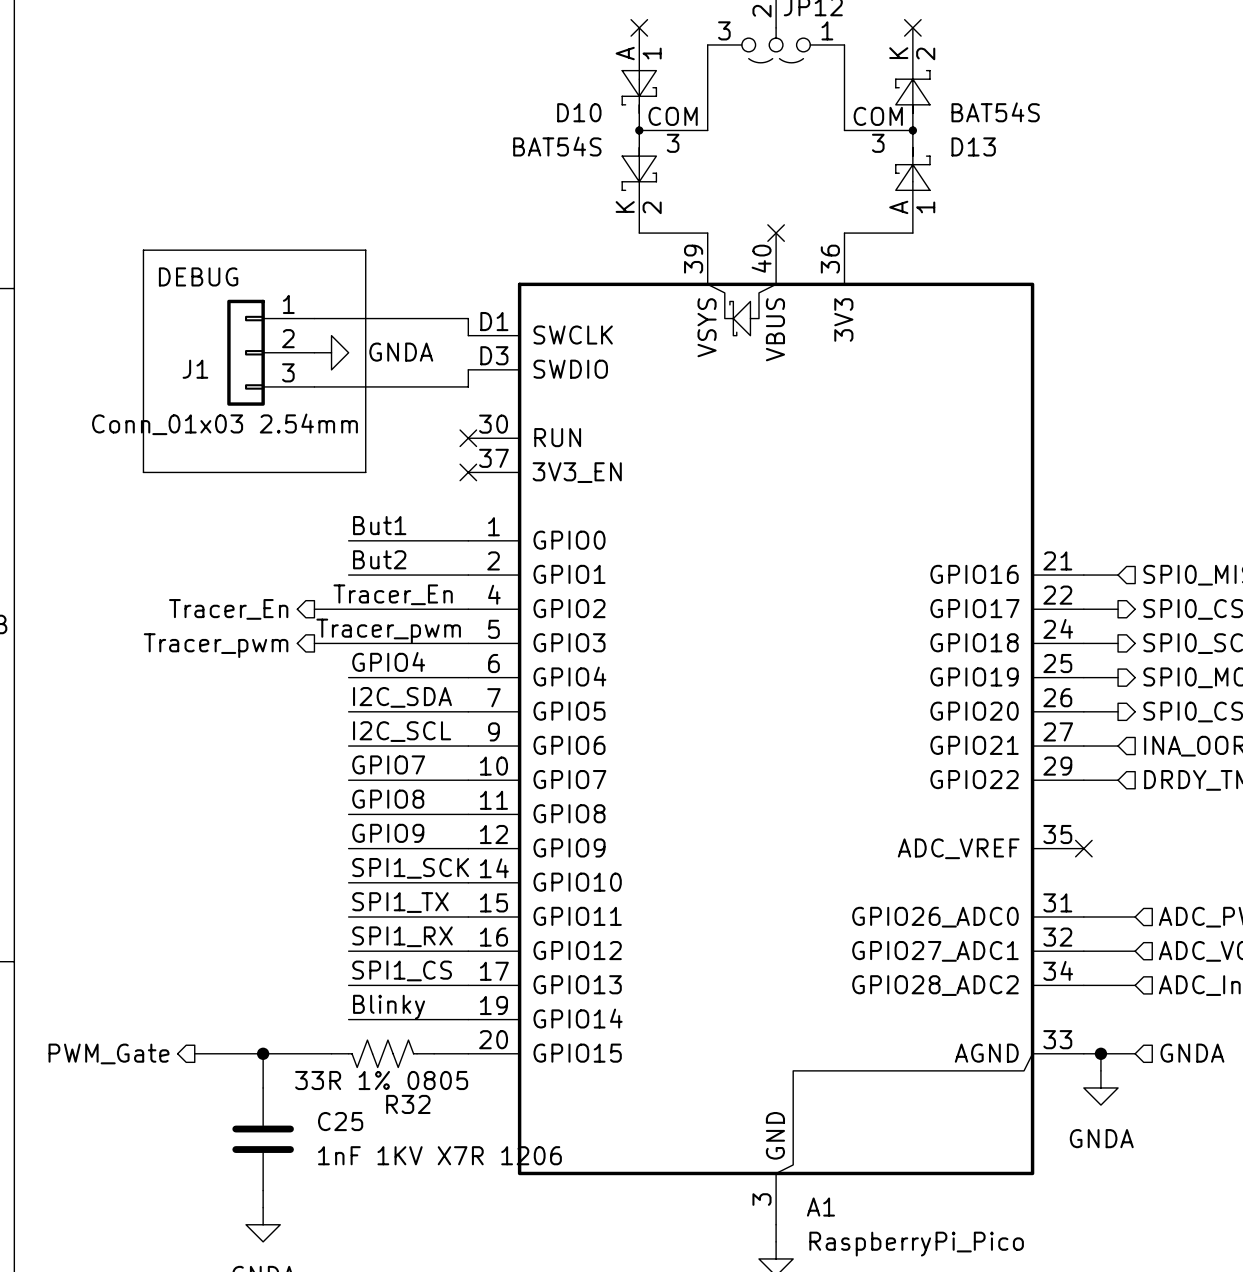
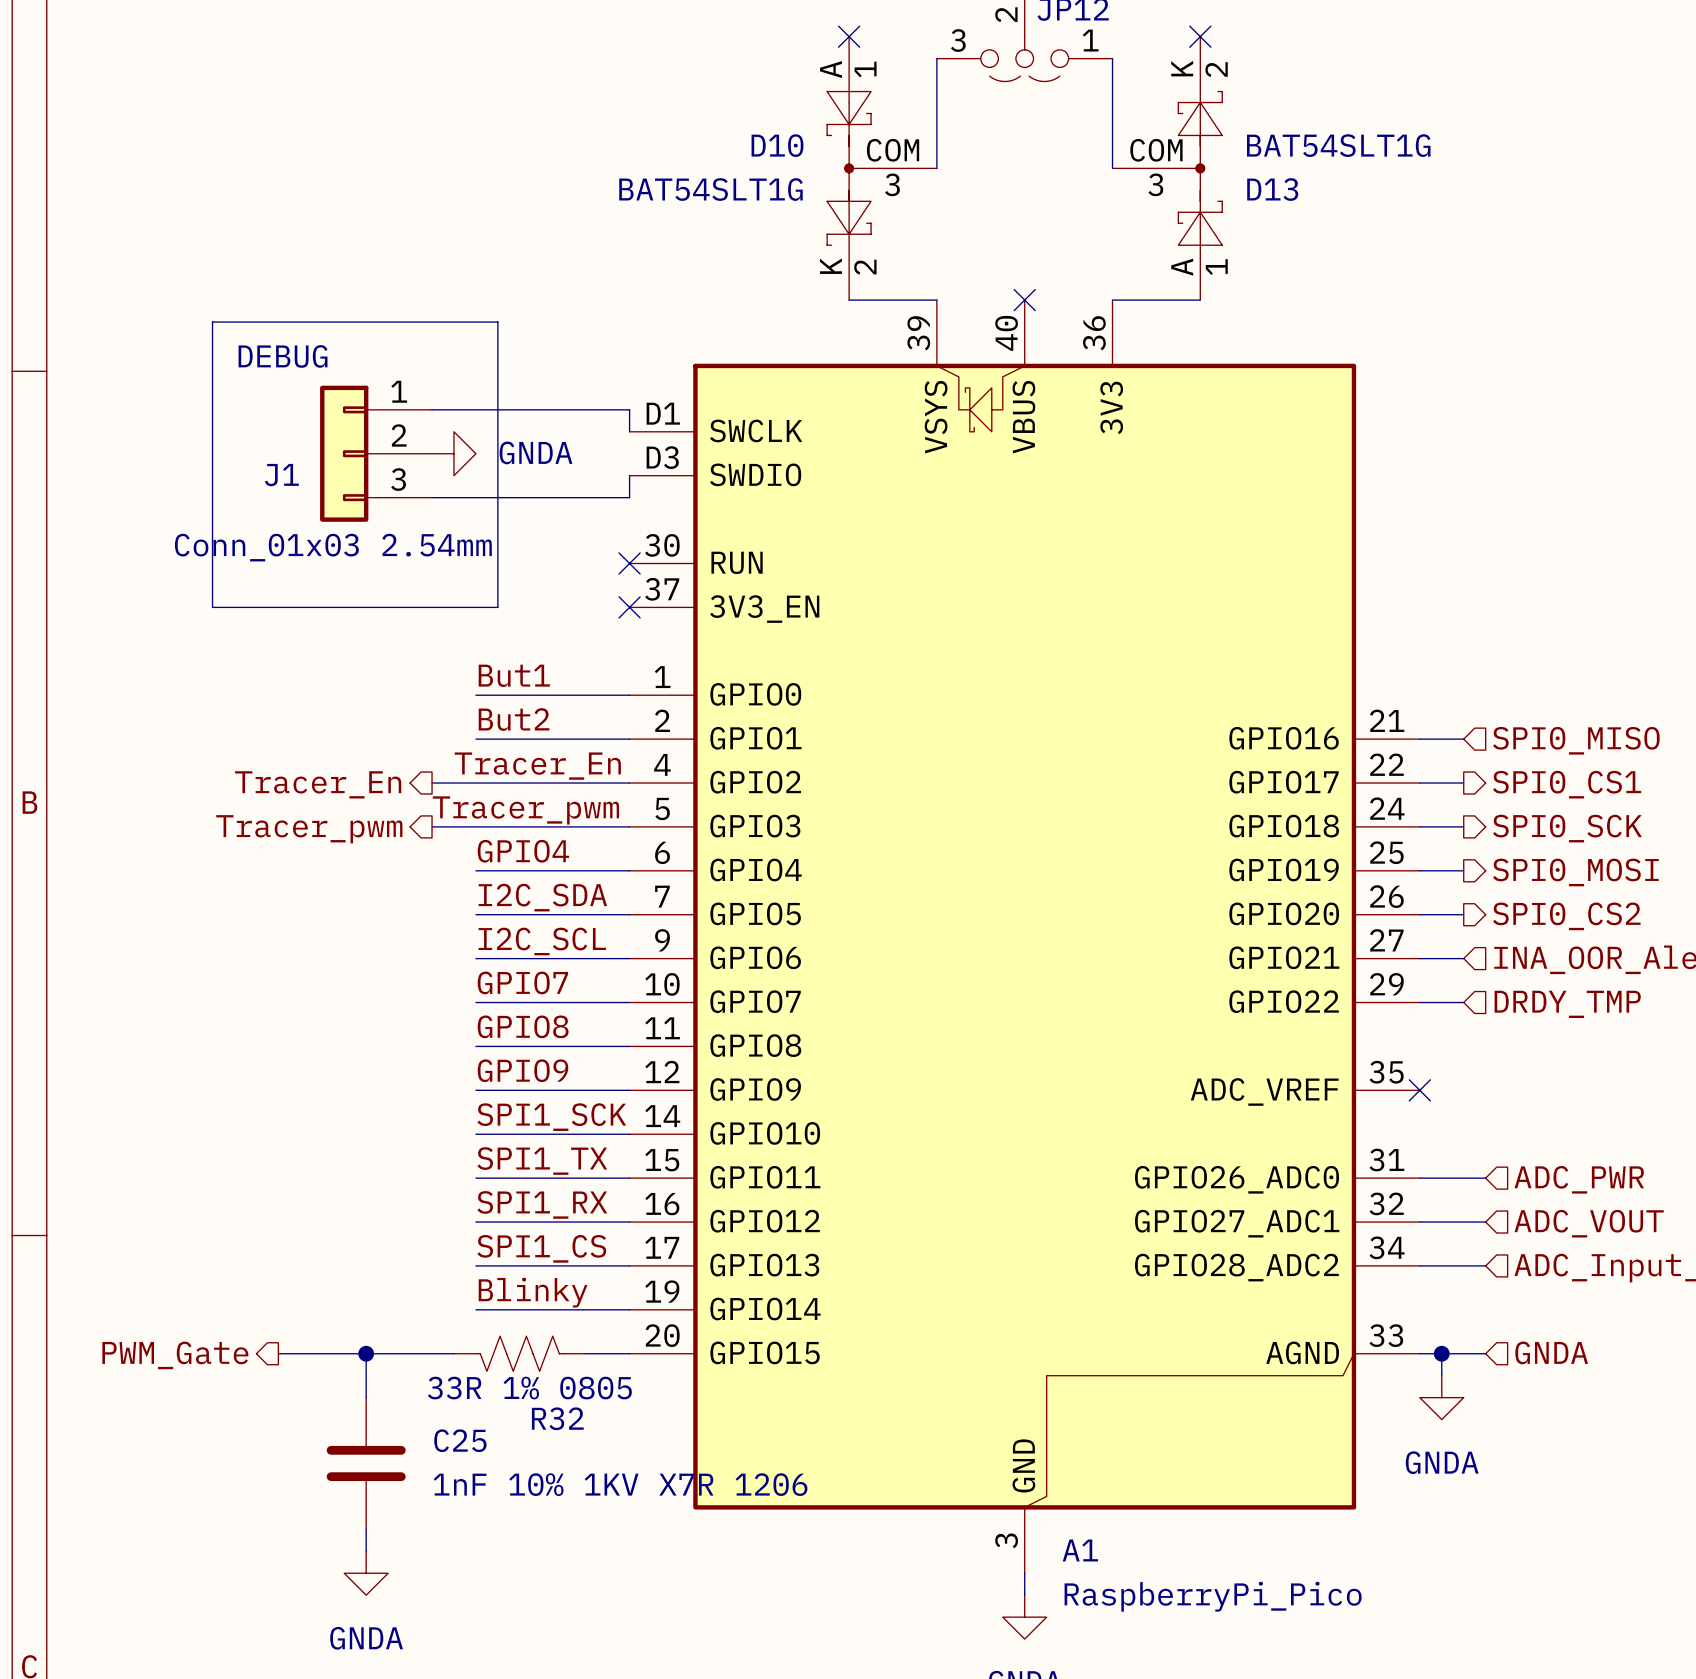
D13 value: BAT54S (995, 112) -> BAT54SLT1G (1338, 145)
D10 value: BAT54S (557, 146) -> BAT54SLT1G (711, 189)
C25 value: 1nF 1KV X7R 1206 (439, 1155) -> 1nF 10% 1KV X7R 1206 (620, 1484)

